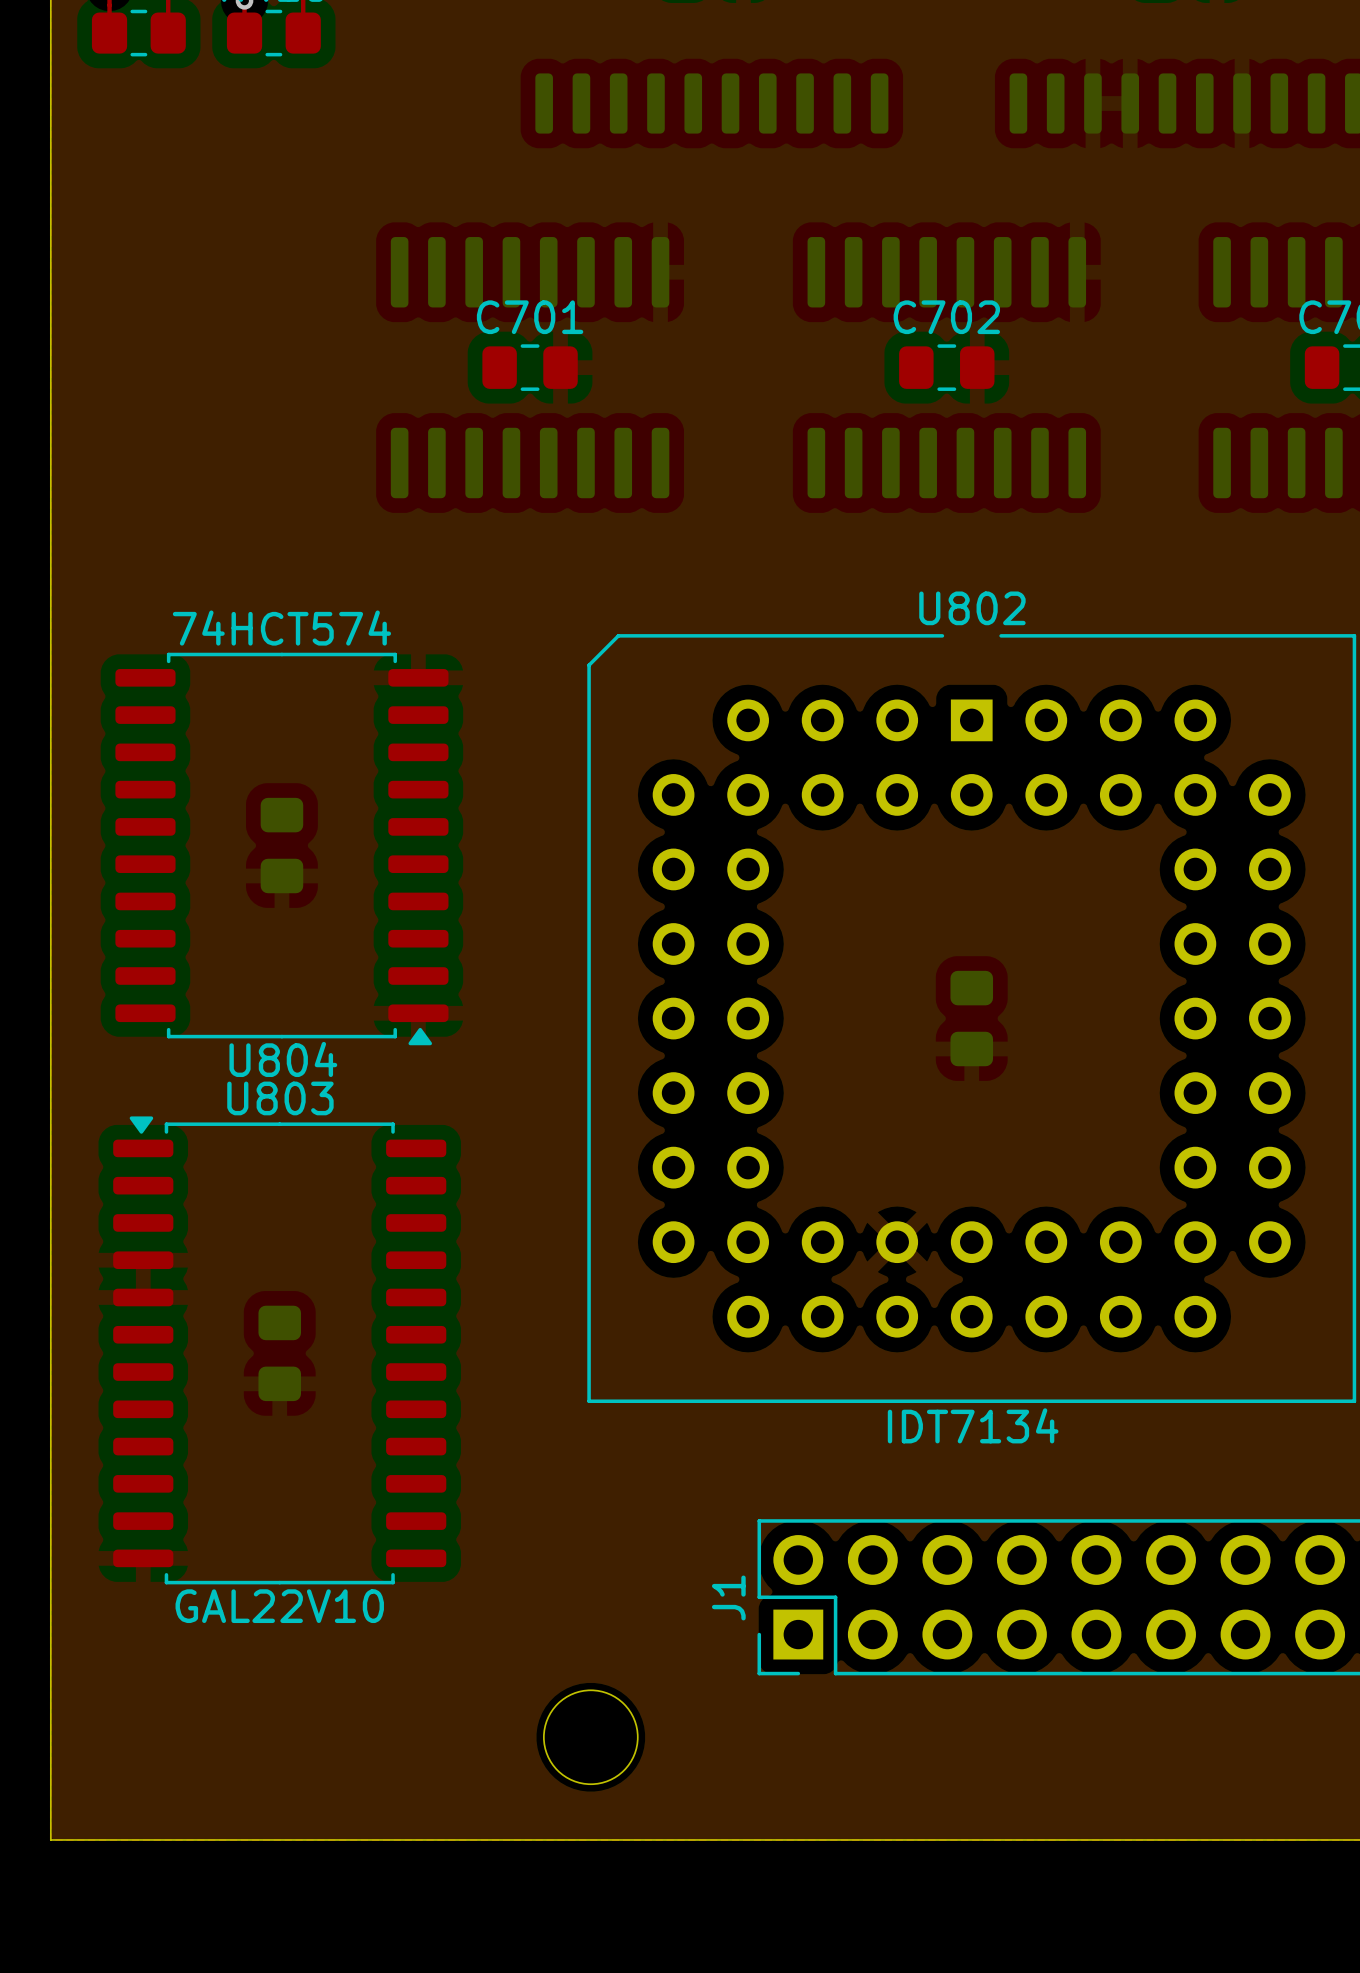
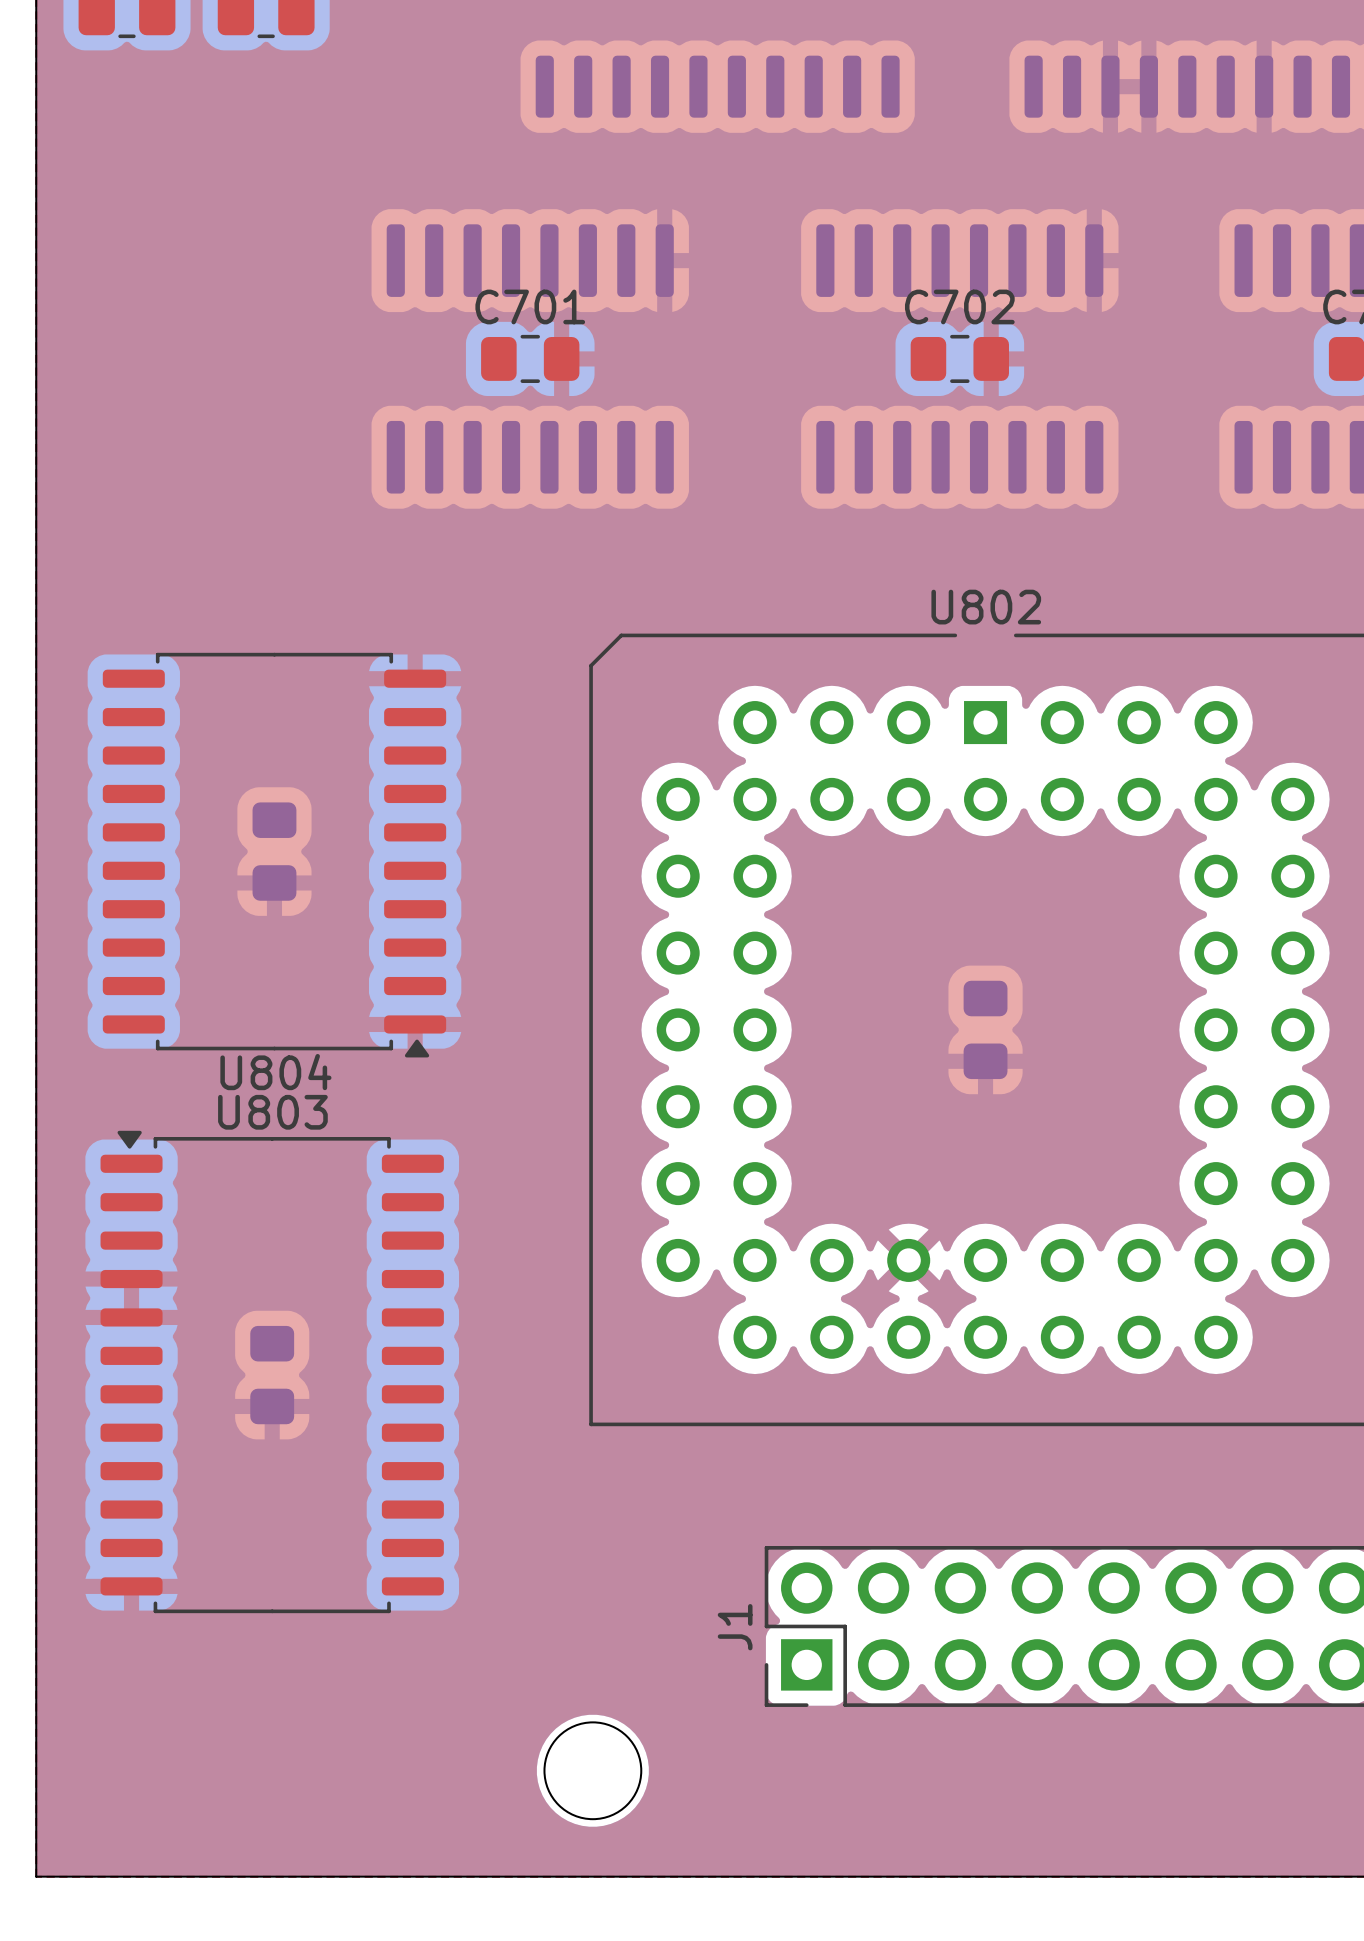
U804 value: 74HCT574 (281, 628) -> none
U802 value: IDT7134 (973, 1425) -> none
U803 value: GAL22V10 (279, 1606) -> none

